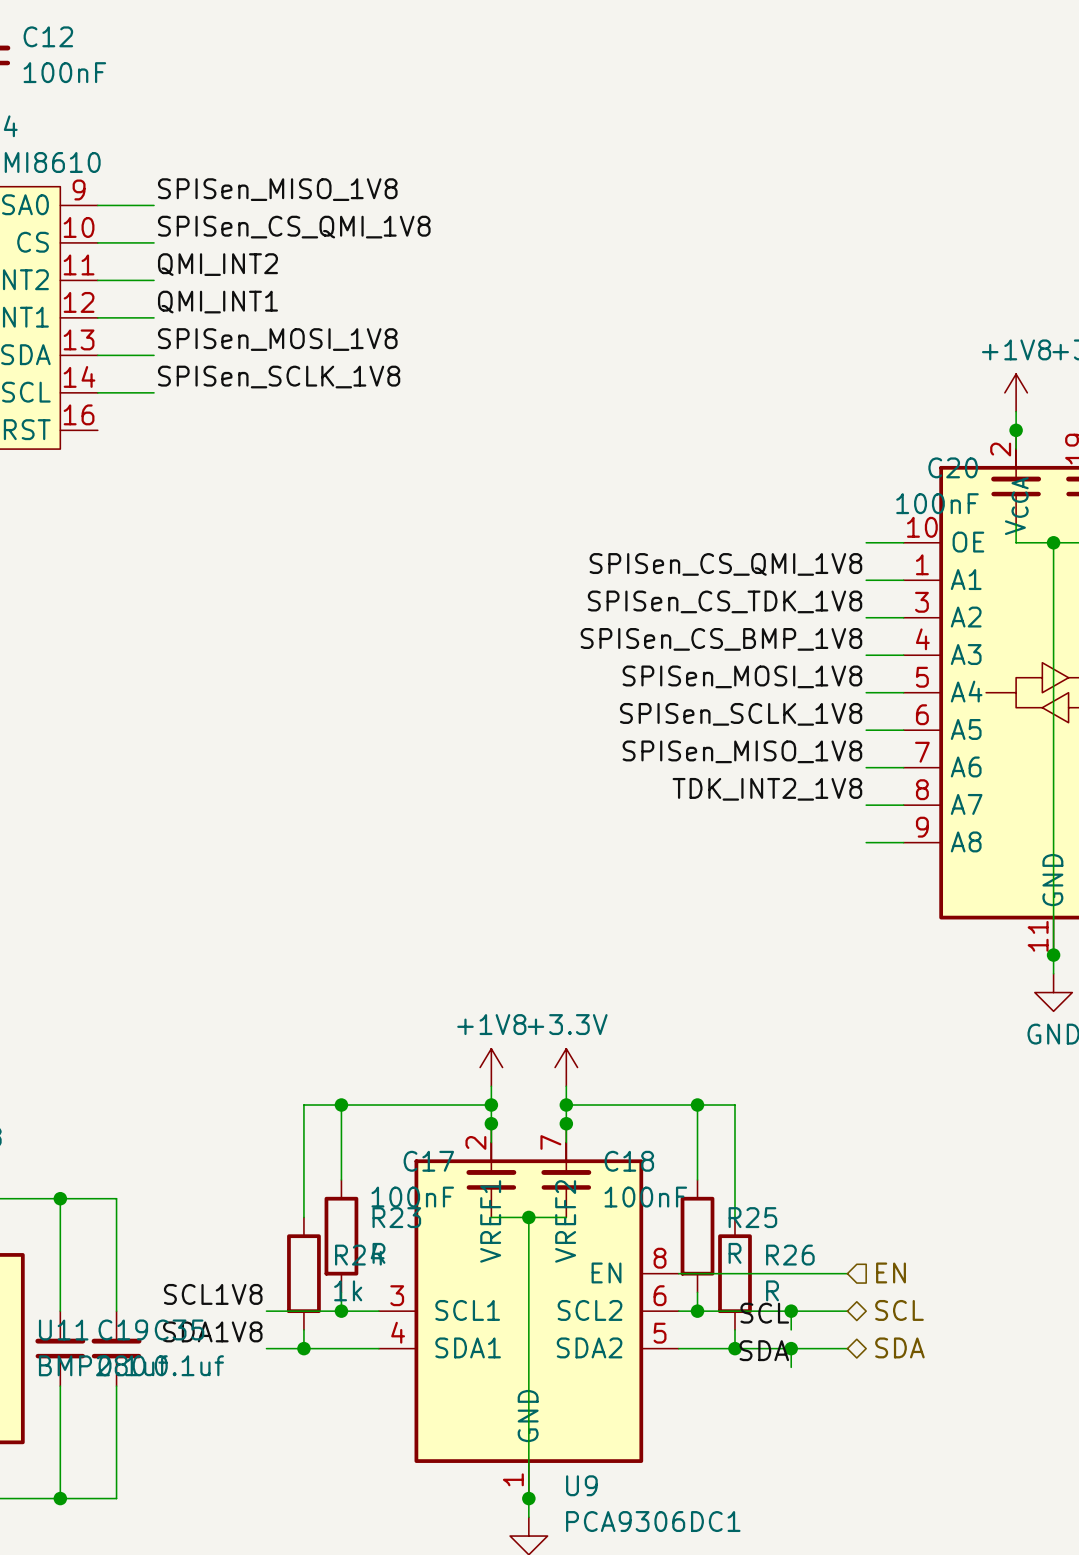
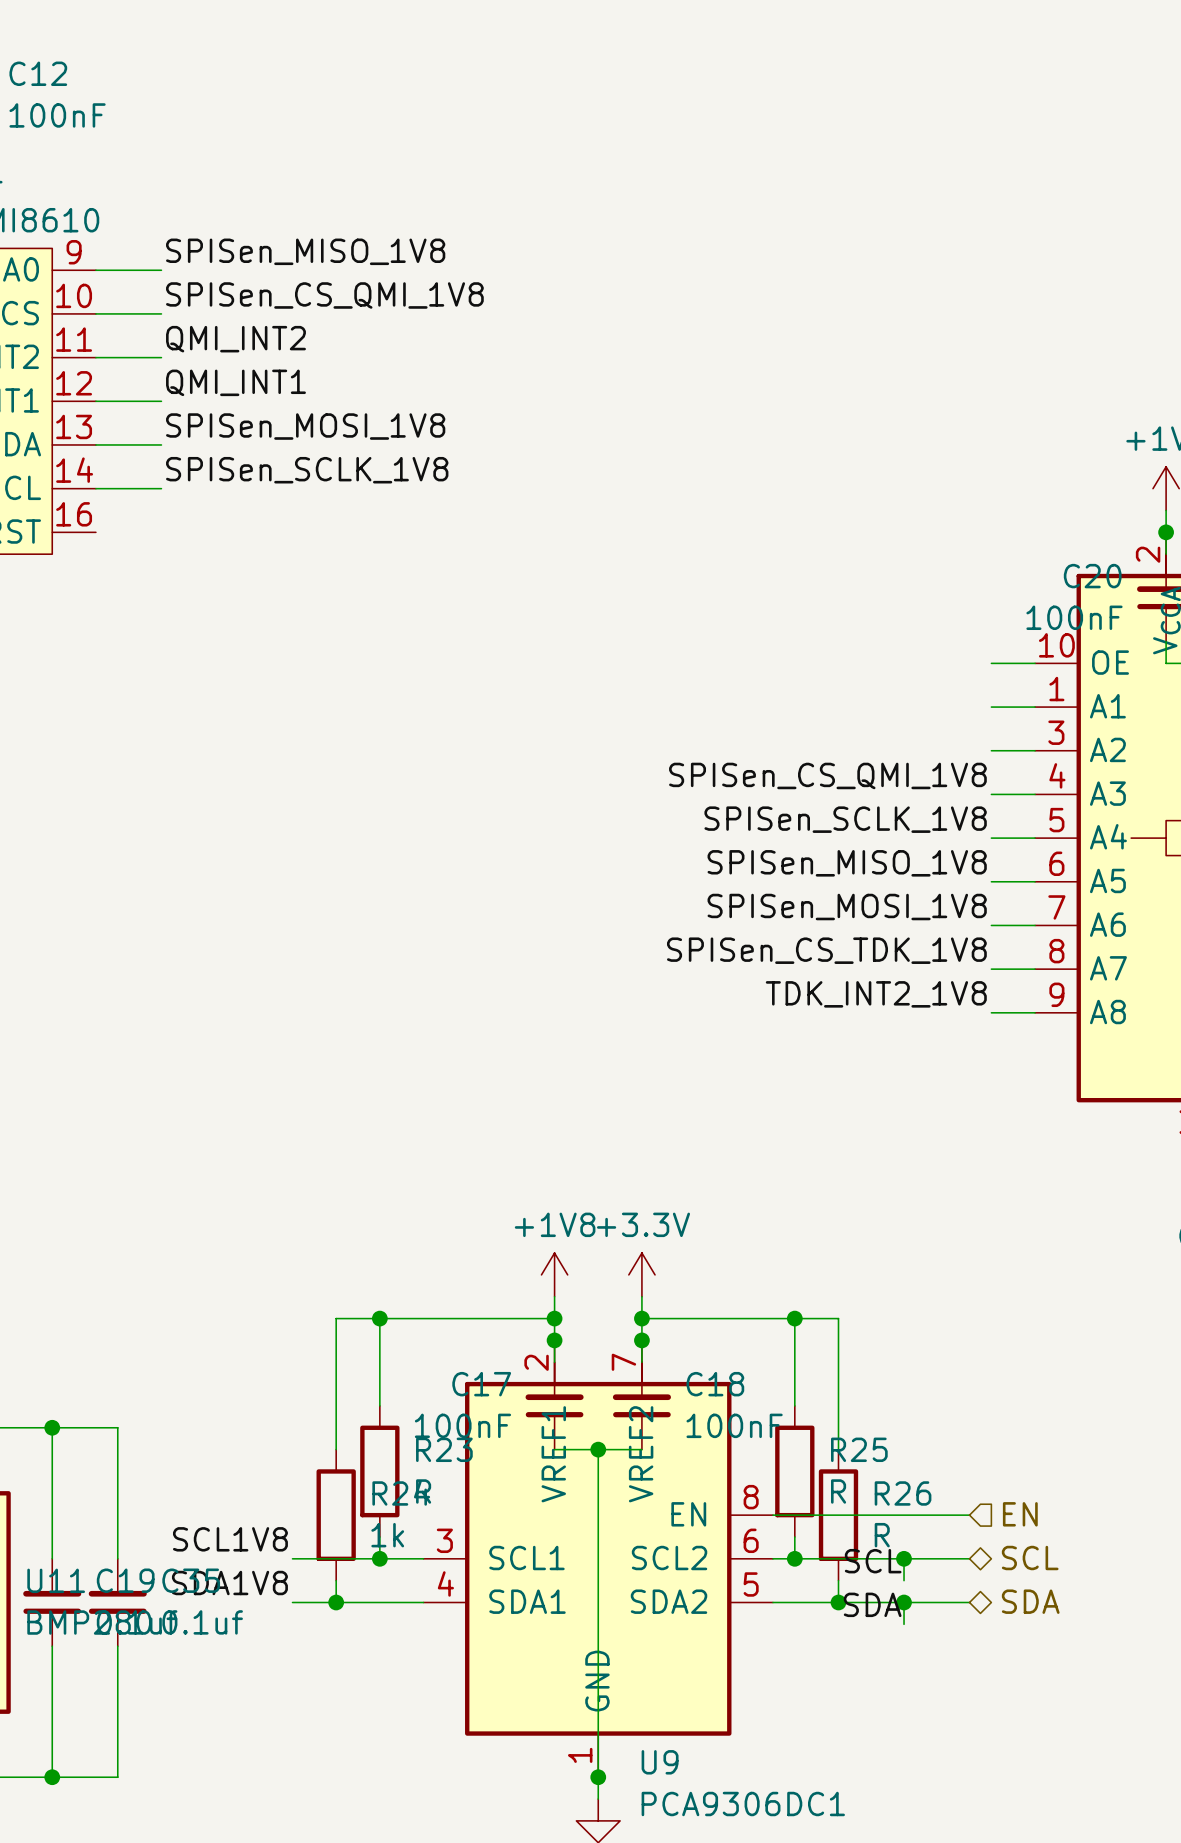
label: SPISen_CS_QMI_1V8 (725, 564) -> none
label: SPISen_CS_TDK_1V8 (725, 601) -> none
label: SPISen_CS_BMP_1V8 (721, 639) -> SPISen_CS_QMI_1V8 (827, 775)
label: SPISen_MOSI_1V8 (742, 676) -> SPISen_SCLK_1V8 (845, 819)
label: SPISen_SCLK_1V8 (741, 714) -> SPISen_MISO_1V8 (847, 863)
label: SPISen_MISO_1V8 (742, 751) -> SPISen_MOSI_1V8 (847, 907)
label: TDK_INT2_1V8 (767, 789) -> SPISen_CS_TDK_1V8 (826, 950)
label: none -> TDK_INT2_1V8 (876, 994)

